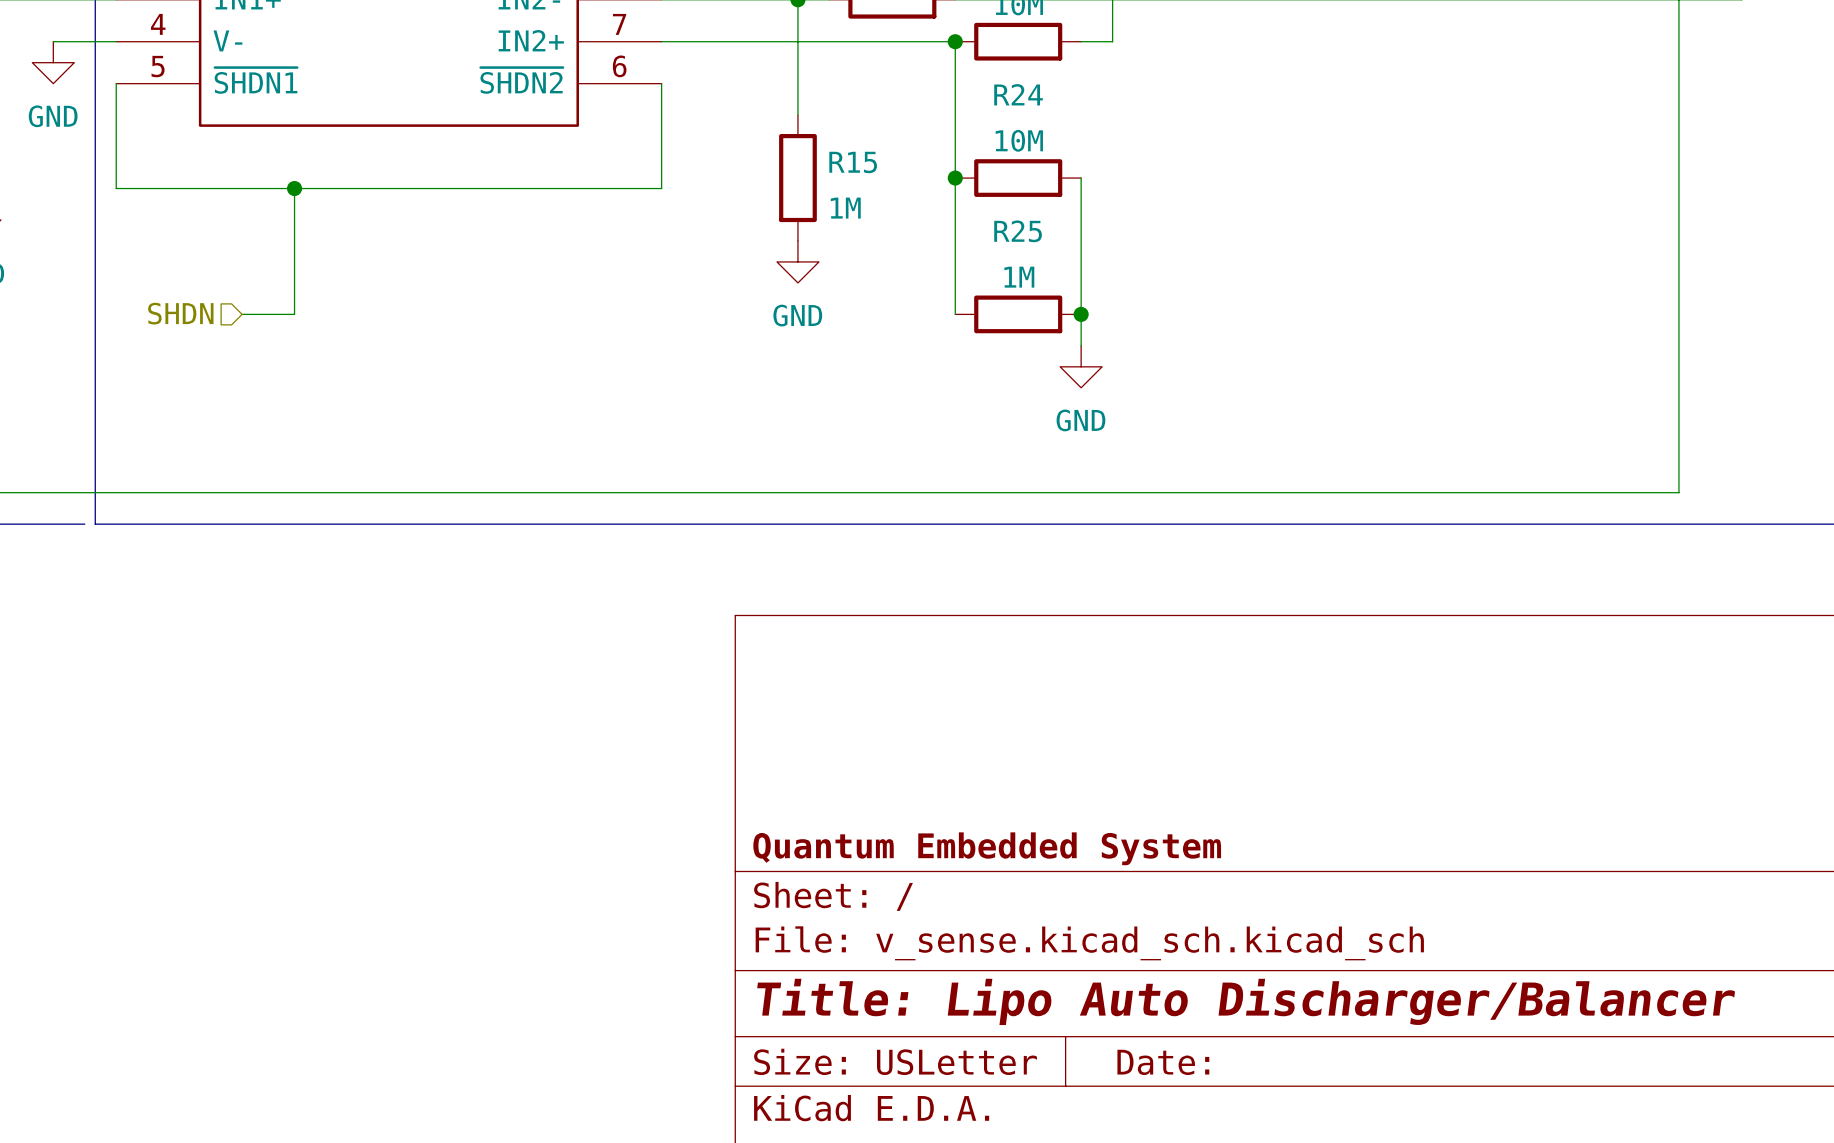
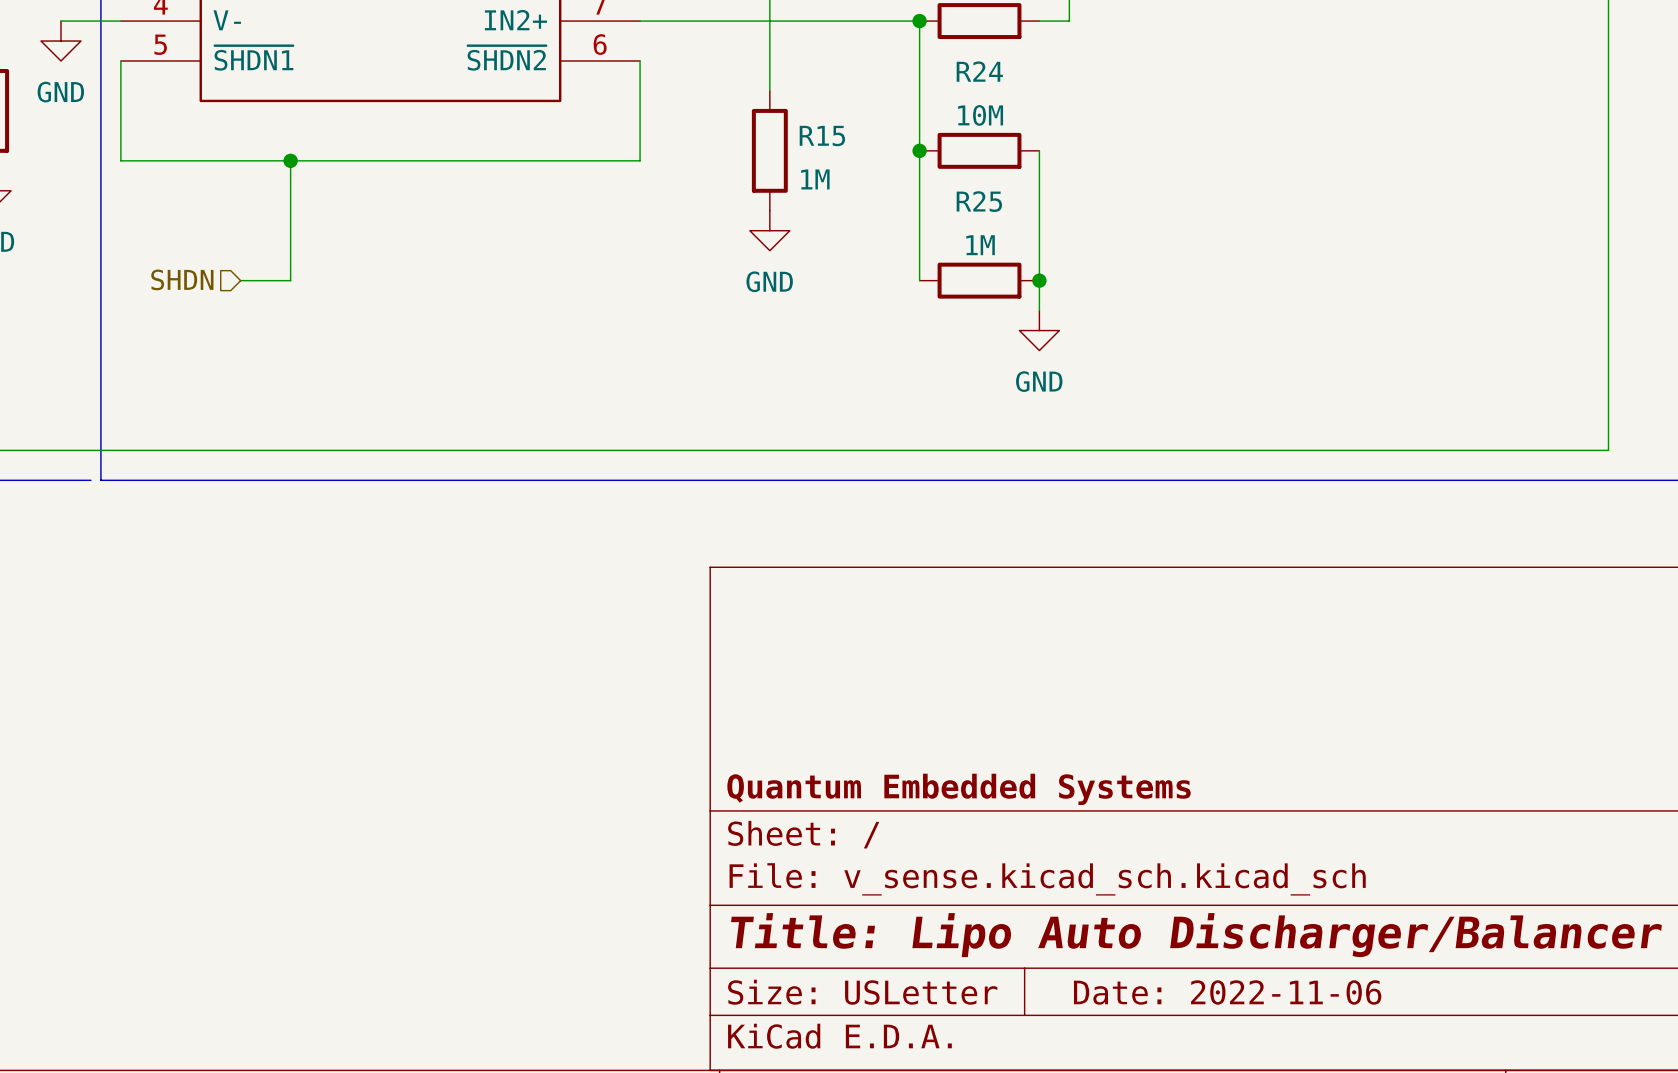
title block: Quantum Embedded System (987, 848) -> Quantum Embedded Systems (959, 789)
title block: Date: (1163, 1062) -> Date: 2022-11-06 (1227, 992)

